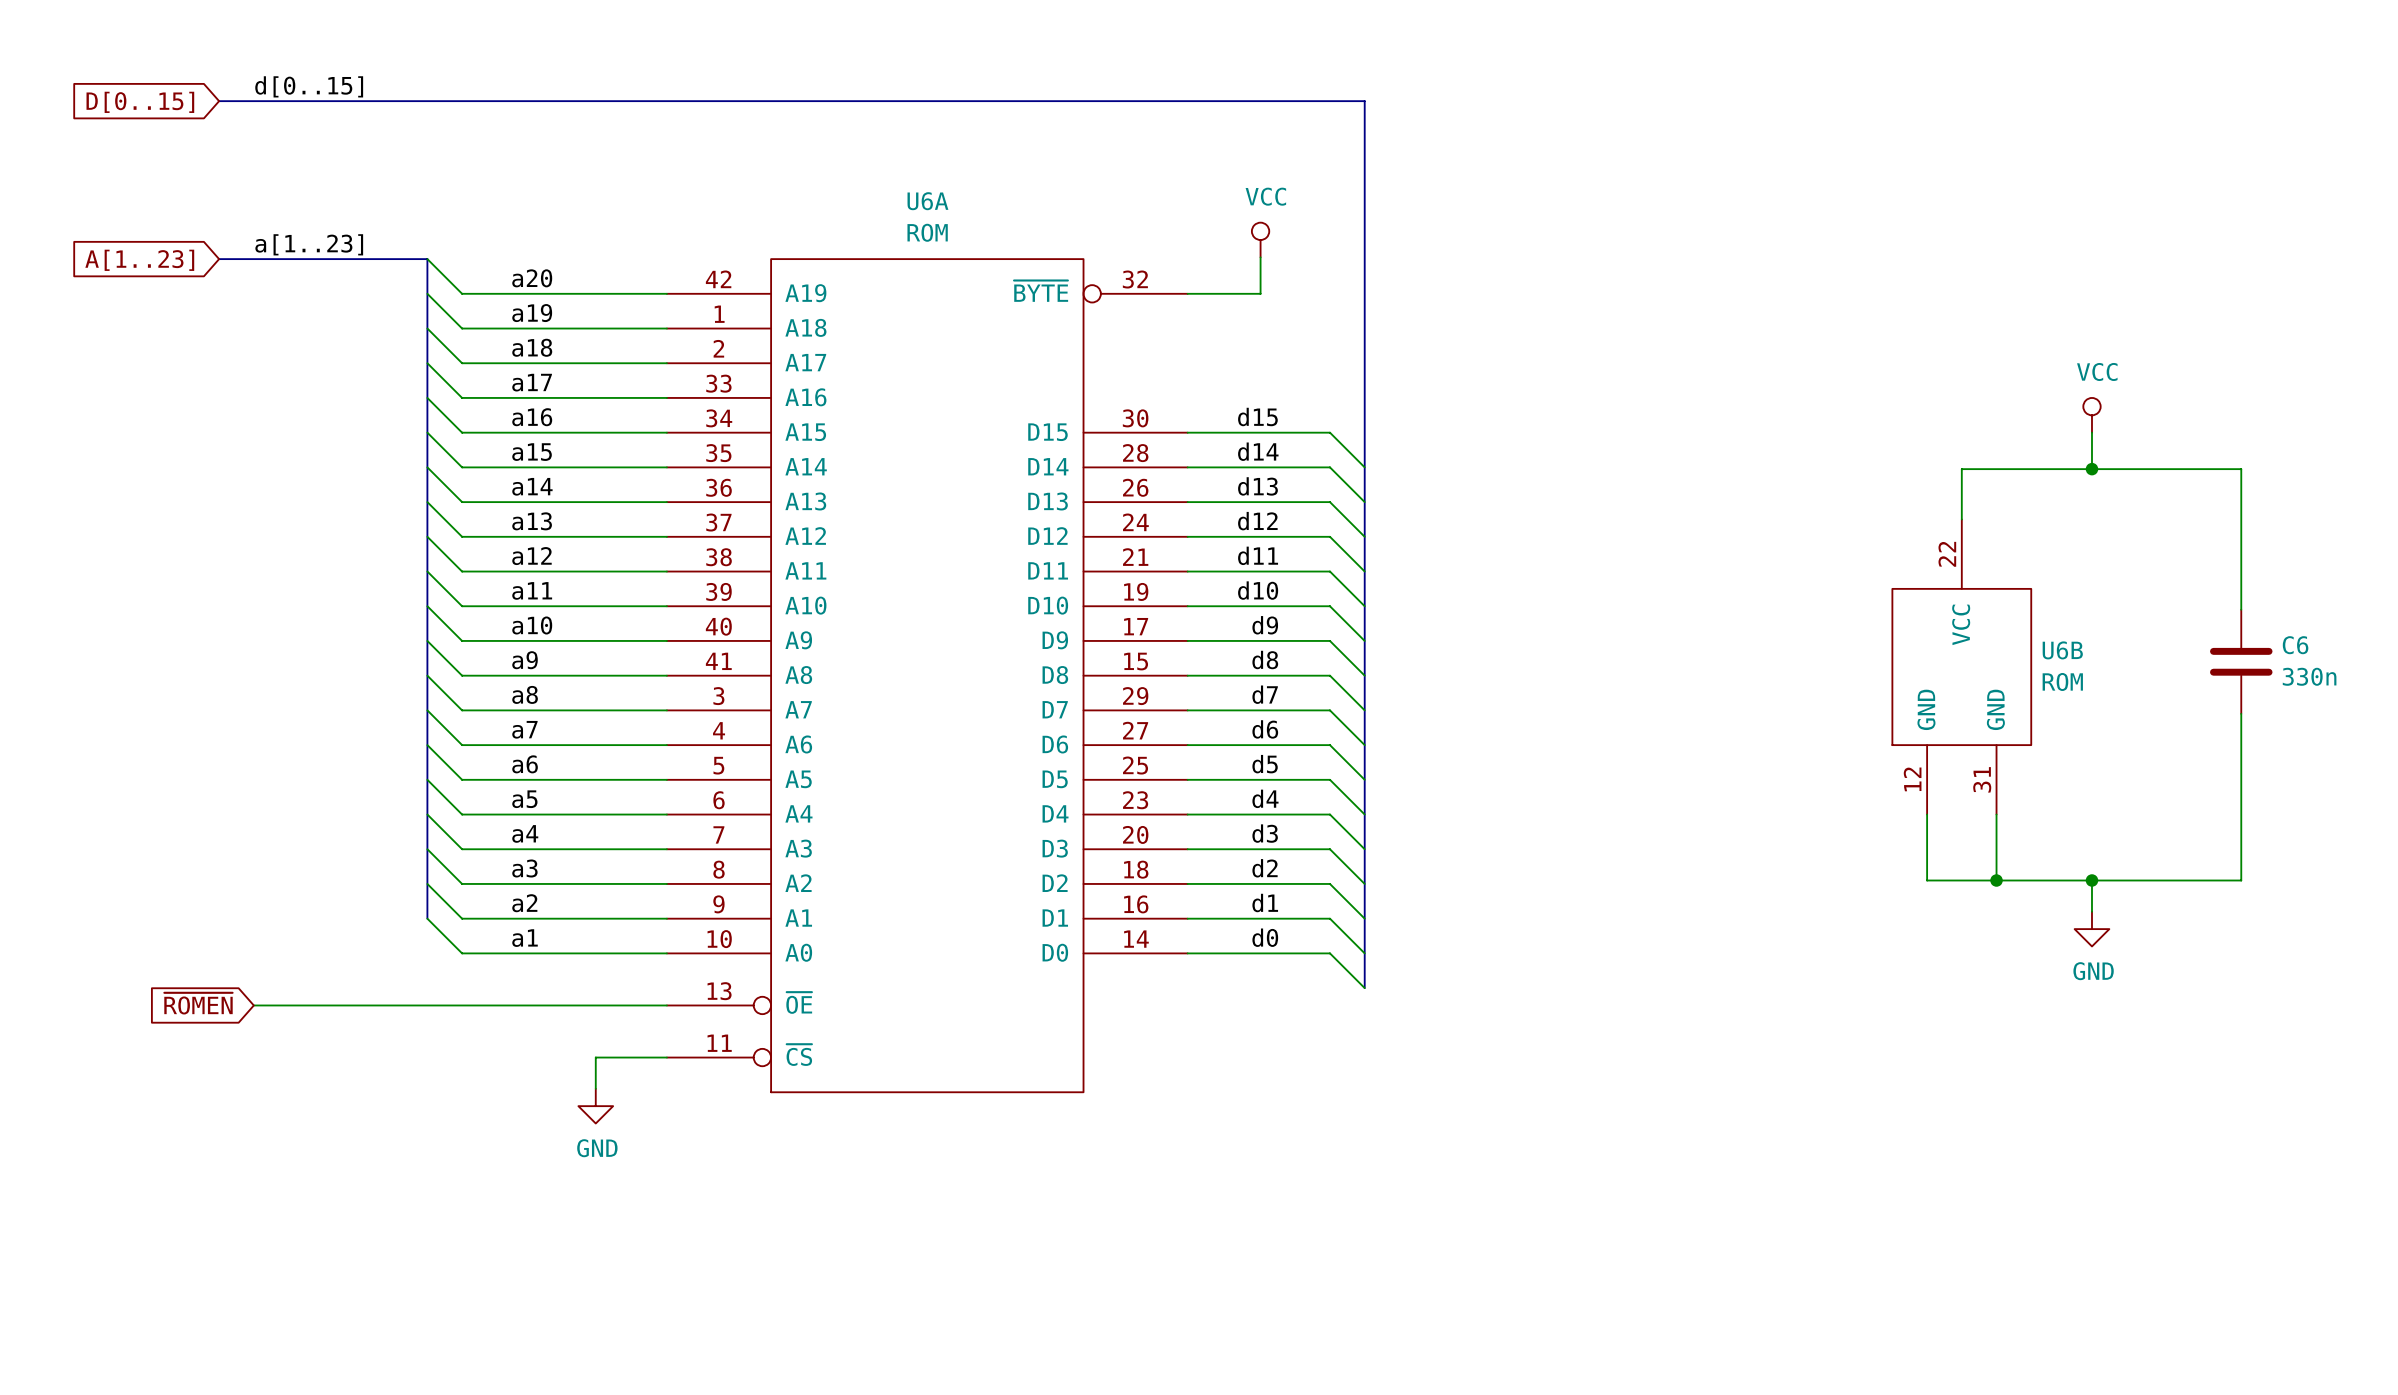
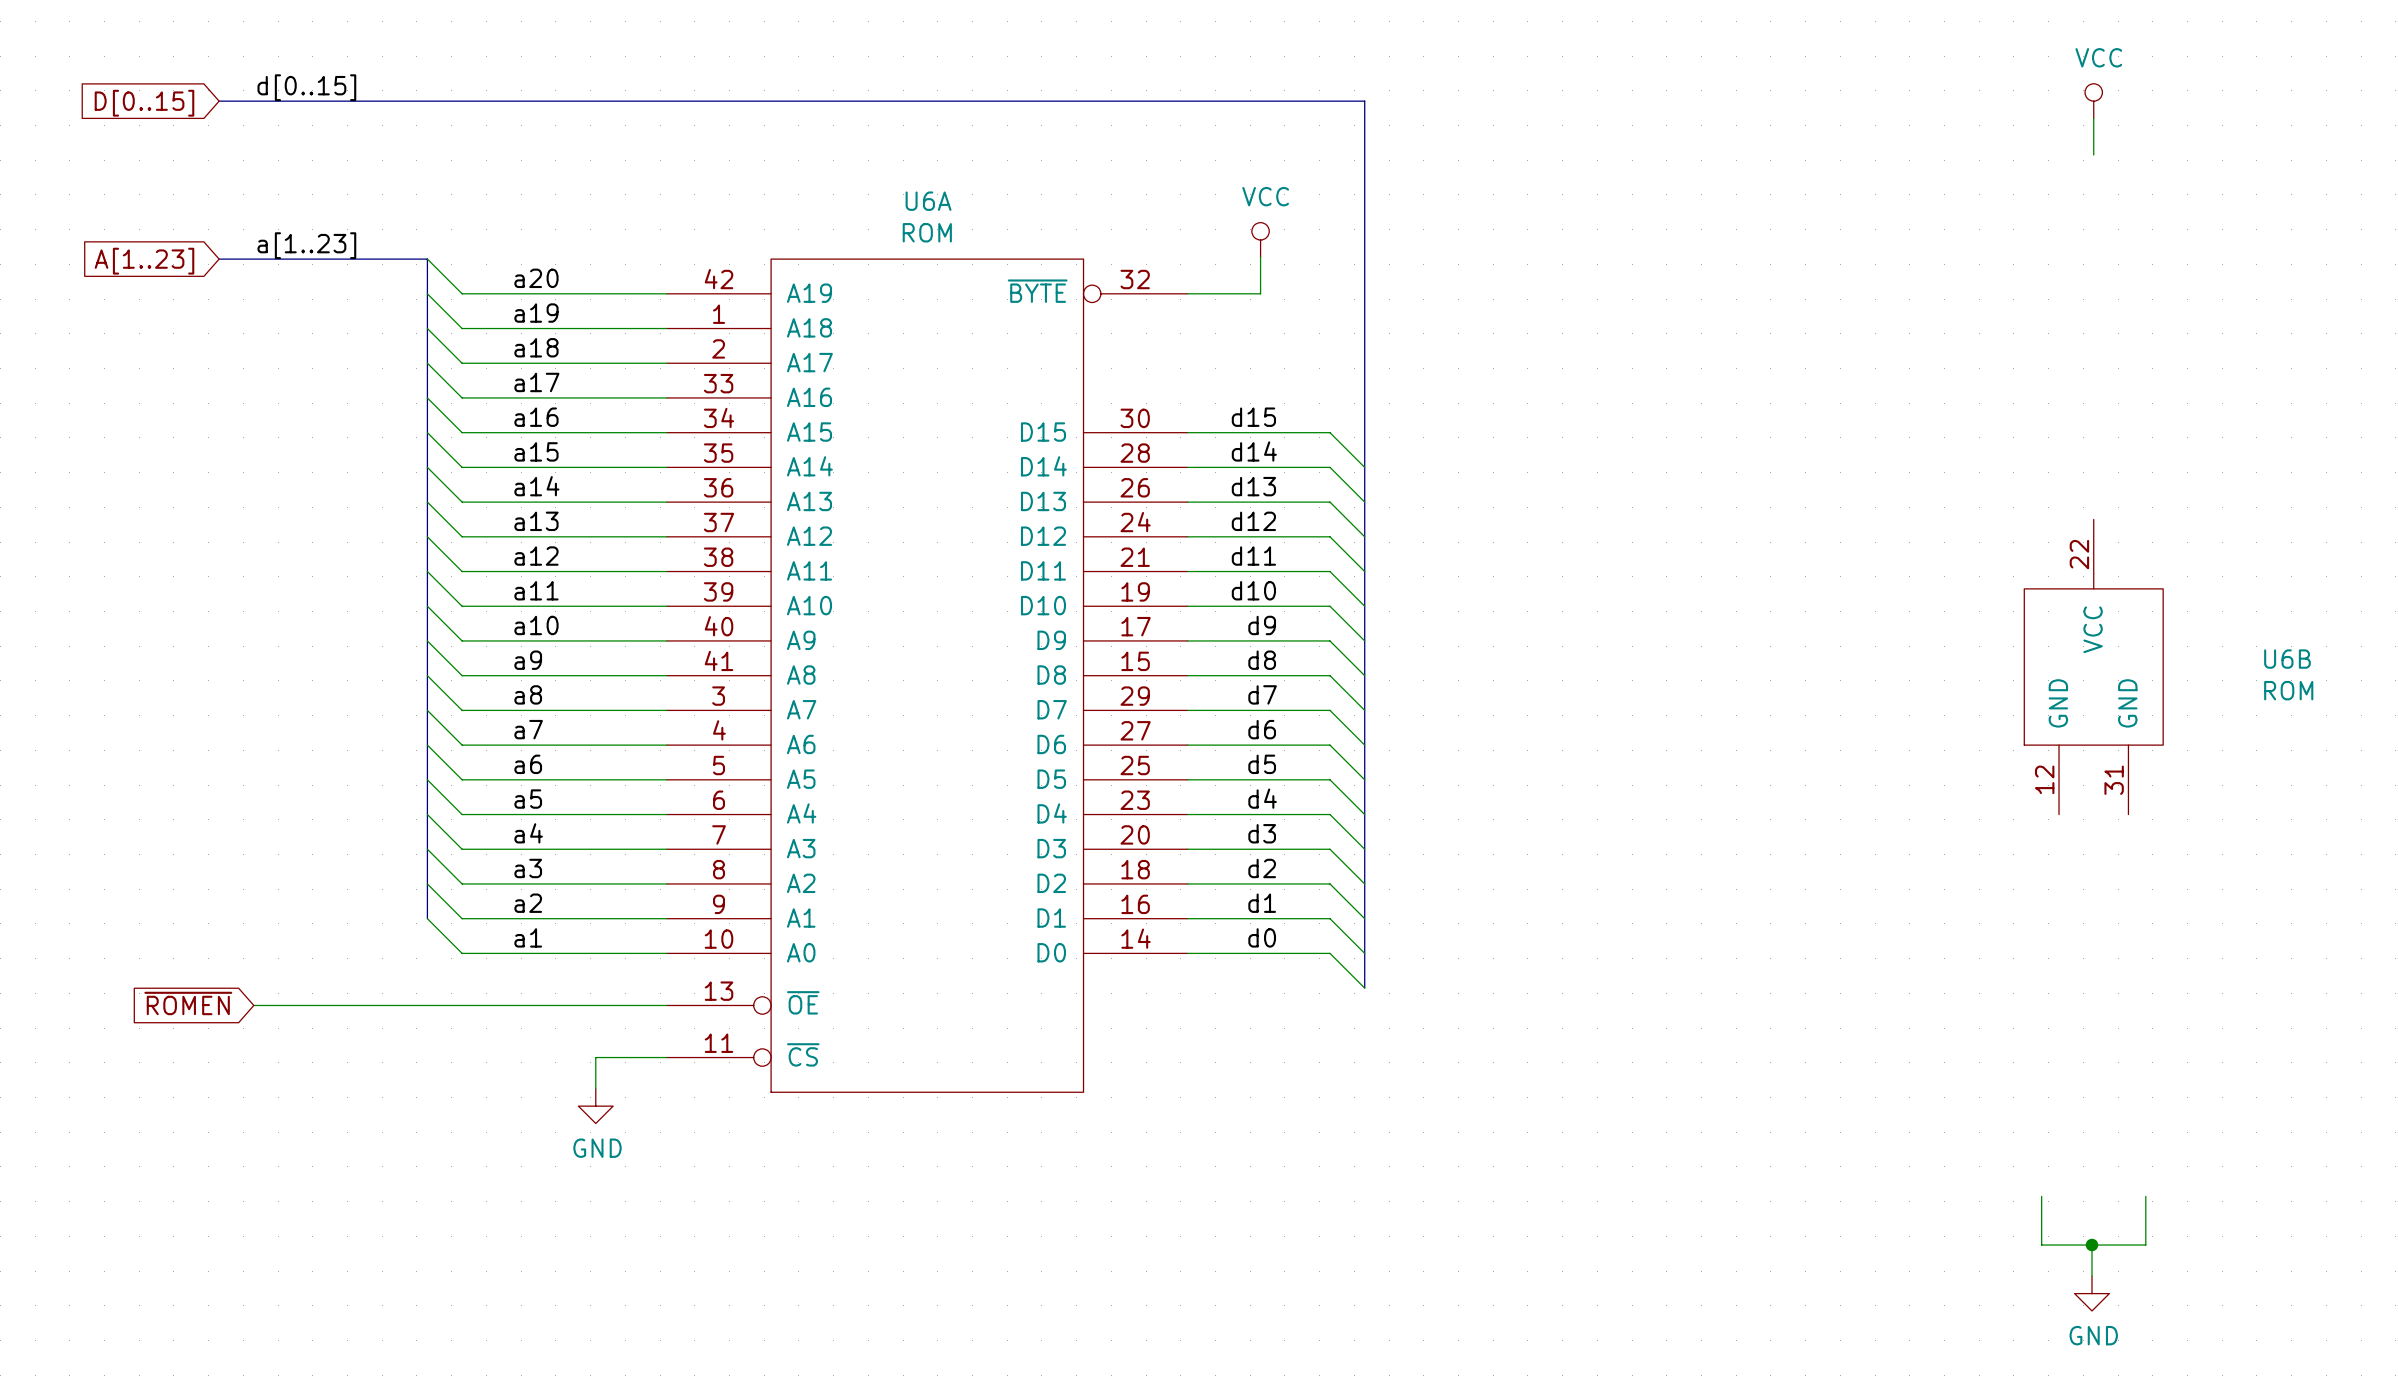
power symbol position: VCC (2091, 415) -> VCC (2093, 101)
wire: (2091, 432) (2091, 469) -> (2093, 118) (2093, 154)
junction: (2091, 469) -> none
wire: (1961, 519) (1961, 469) (2241, 469) (2241, 609) -> none
U6B name position: U6B (2062, 650) -> U6B (2287, 659)
C6: 330n (2241, 661) -> none
U6B position: (1961, 667) -> (2093, 667)
U6B value position: ROM (2062, 681) -> ROM (2288, 690)
wire: (2241, 713) (2241, 880) (1927, 880) (1927, 814) -> none
wire: (1996, 814) (1996, 880) -> none
junction: (1996, 880) -> none
wire: (2091, 880) (2091, 911) -> none
junction: (2091, 880) -> none
power symbol: GND (2091, 929) -> none
wire: none -> (2041, 1196) (2041, 1245) (2145, 1245) (2145, 1196)
wire: none -> (2091, 1245) (2091, 1276)
junction: none -> (2091, 1245)
power symbol: none -> GND (2091, 1293)

